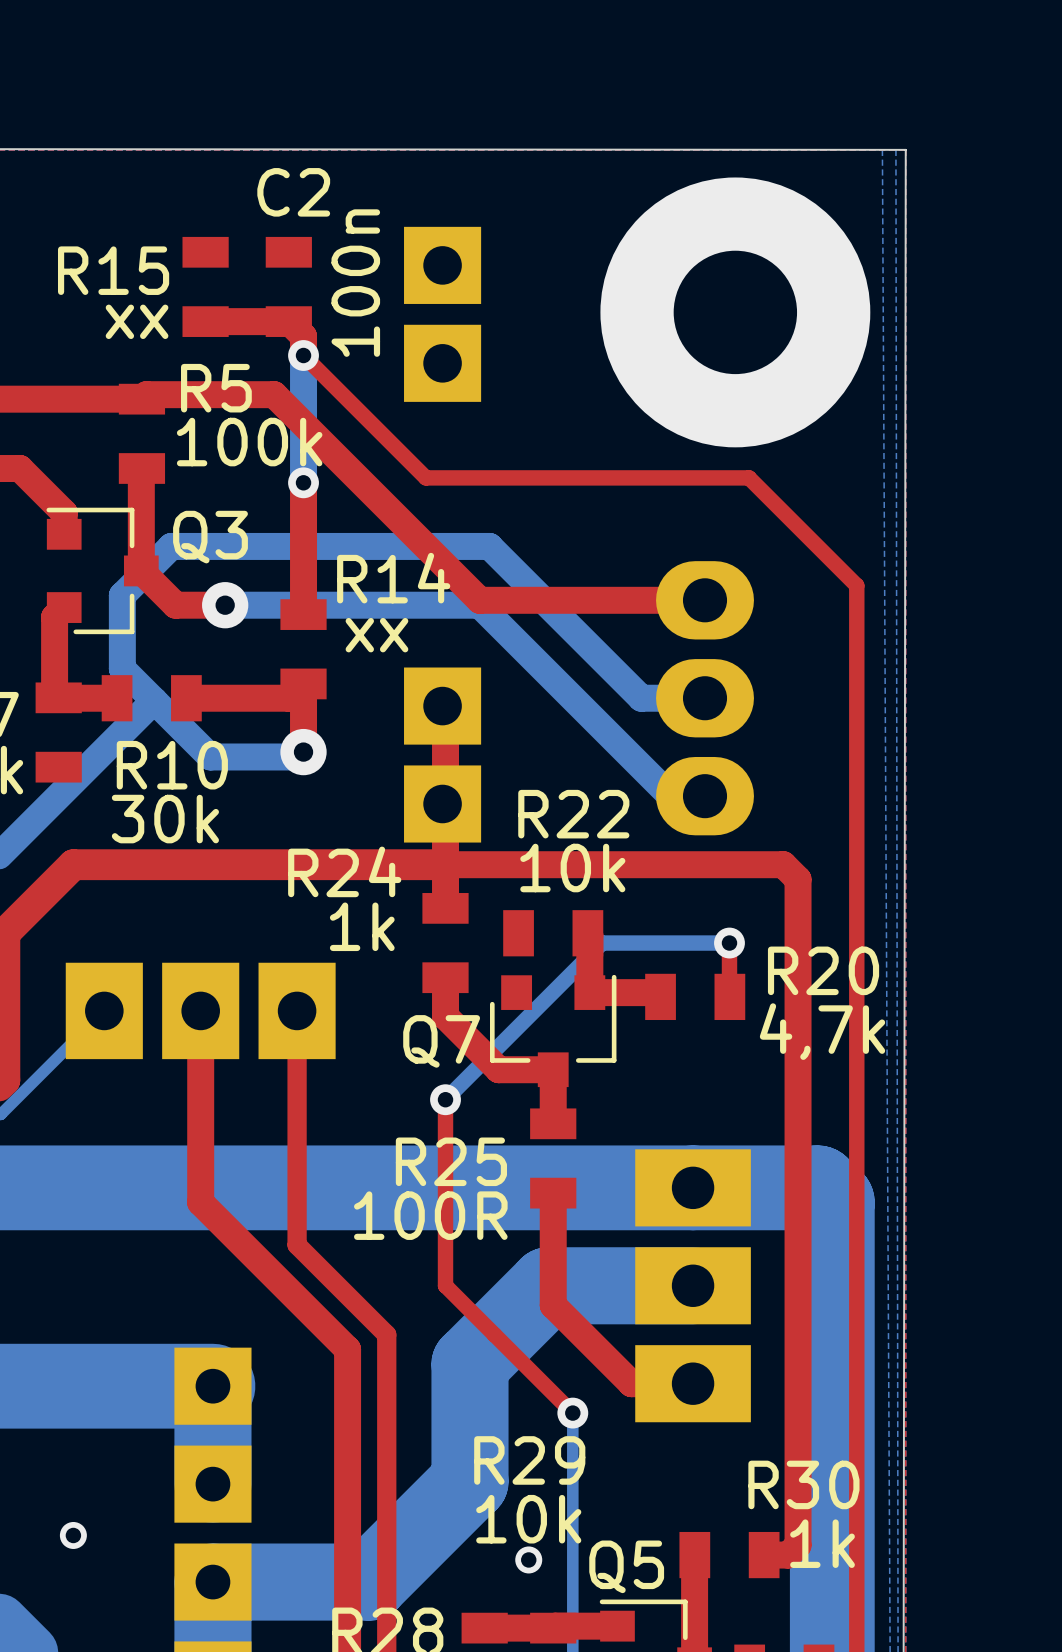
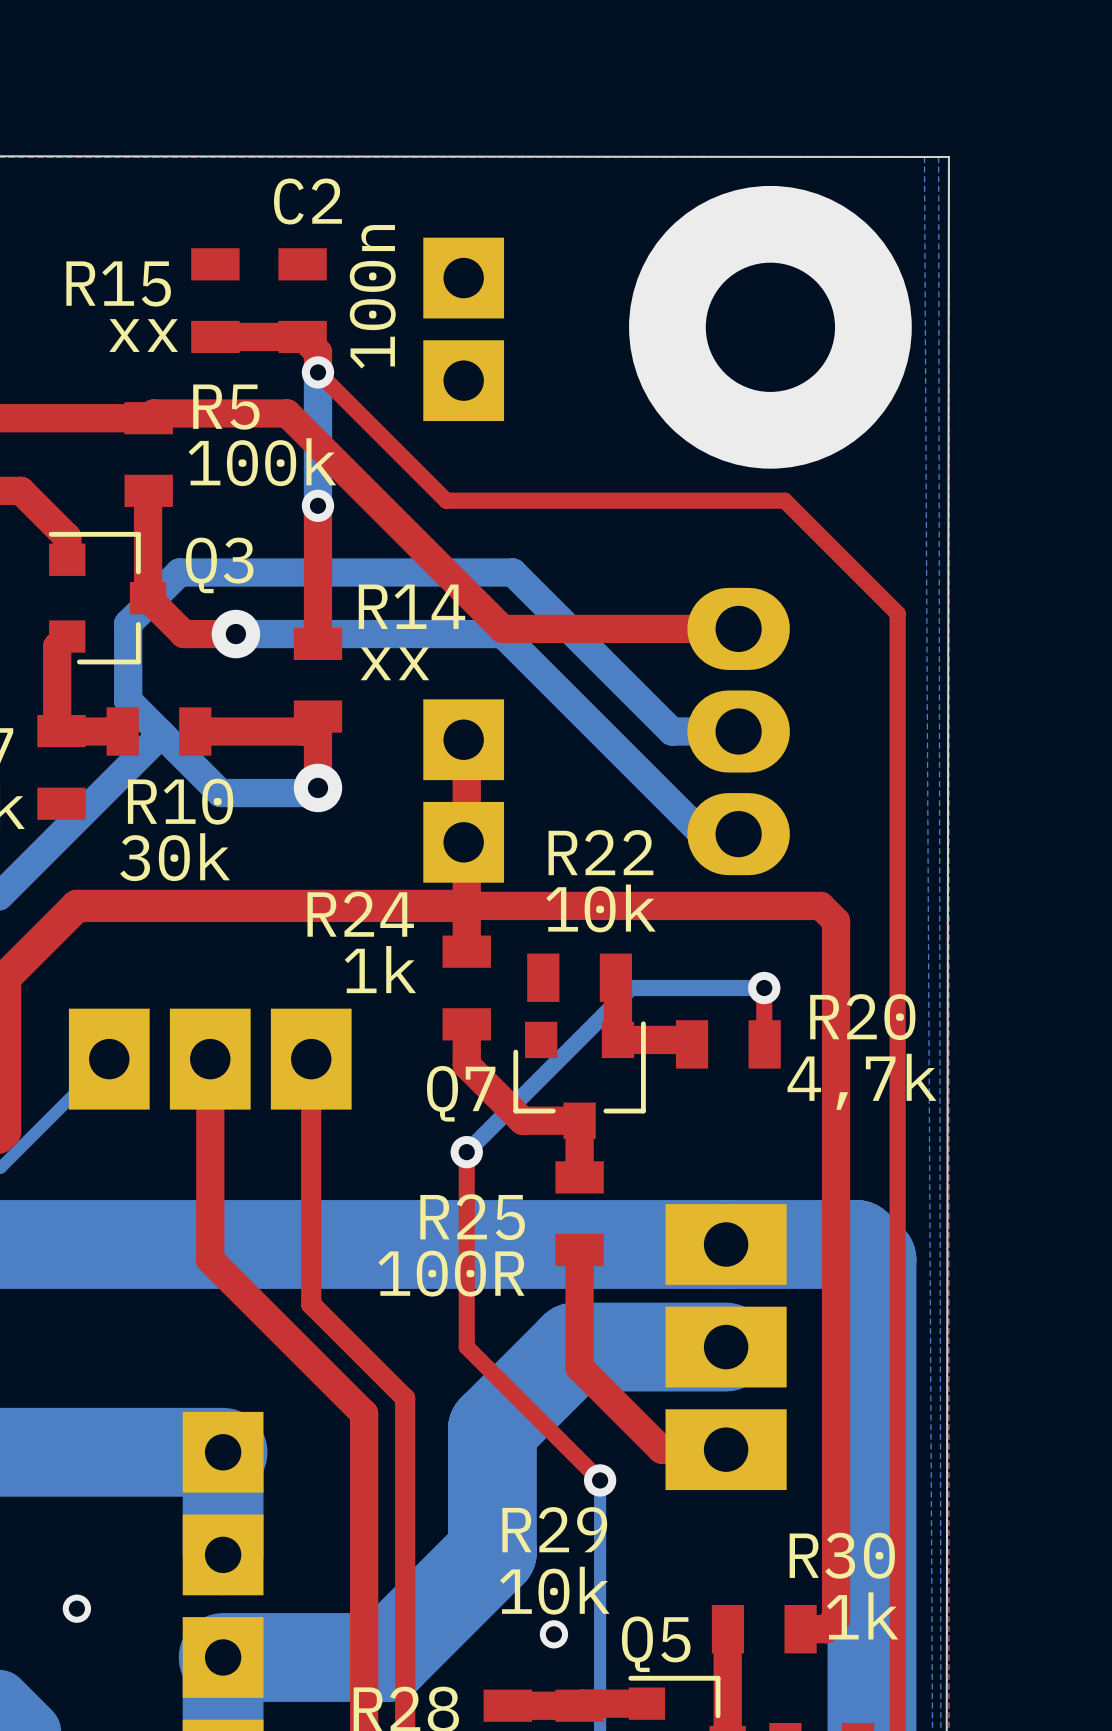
bottom track width: thin (693, 1285) (548, 1285) (469, 1364) (469, 1481) (369, 1582) (212, 1582) -> thick (726, 1347) (574, 1347) (492, 1429) (492, 1552) (387, 1657) (223, 1657)

